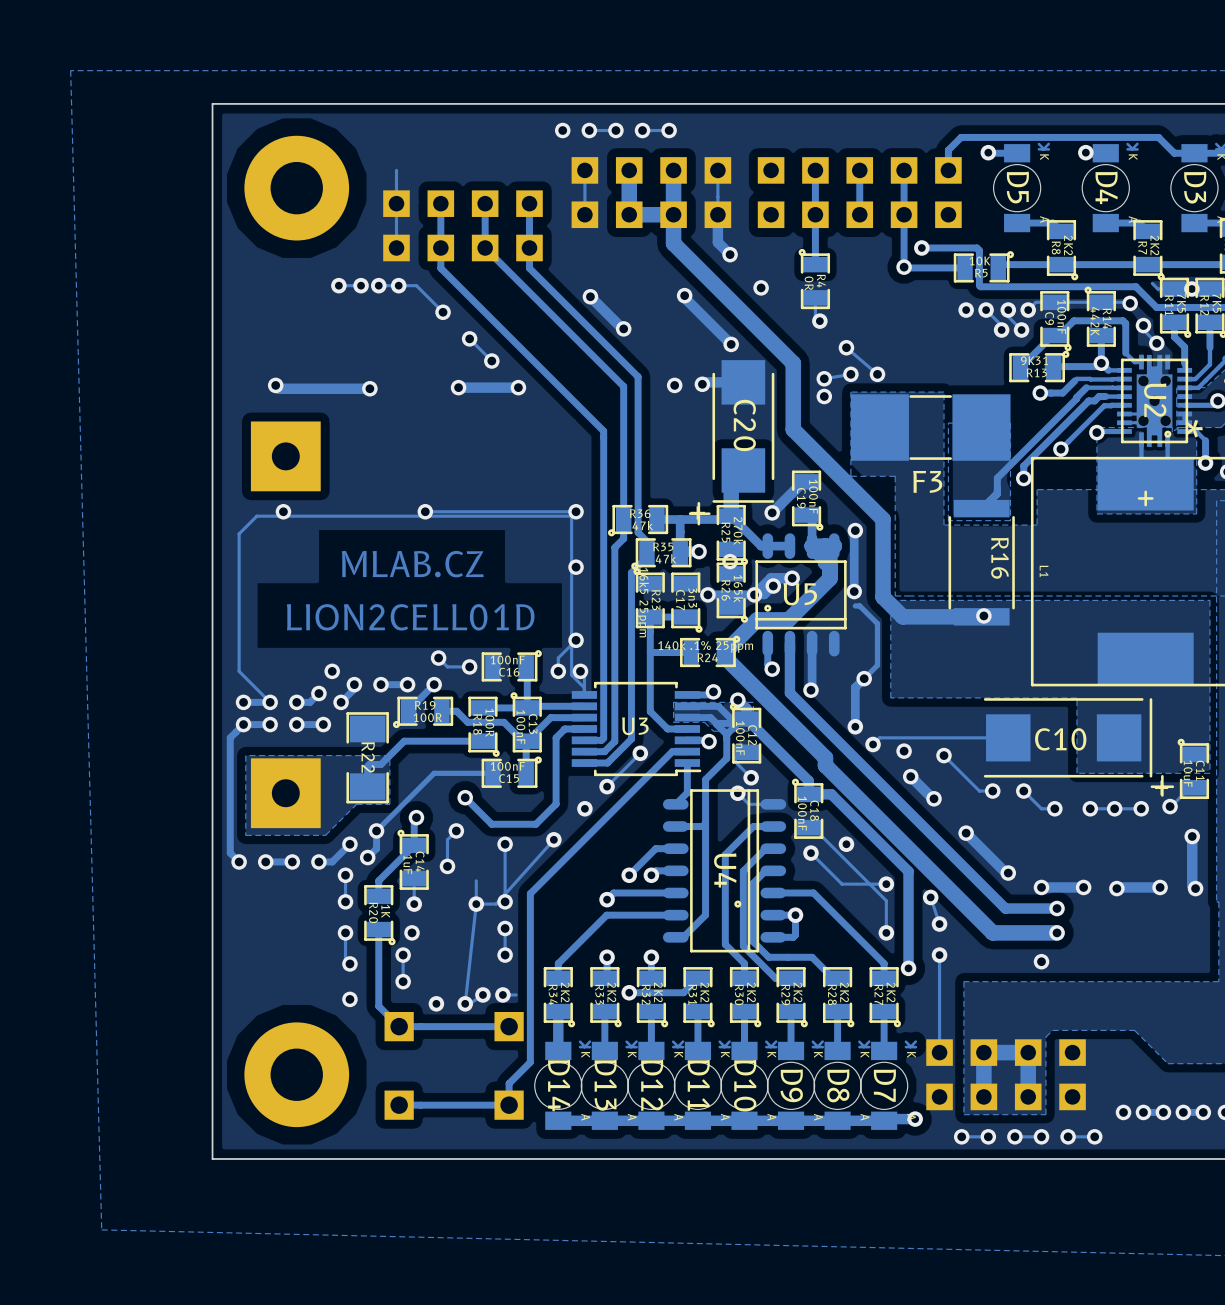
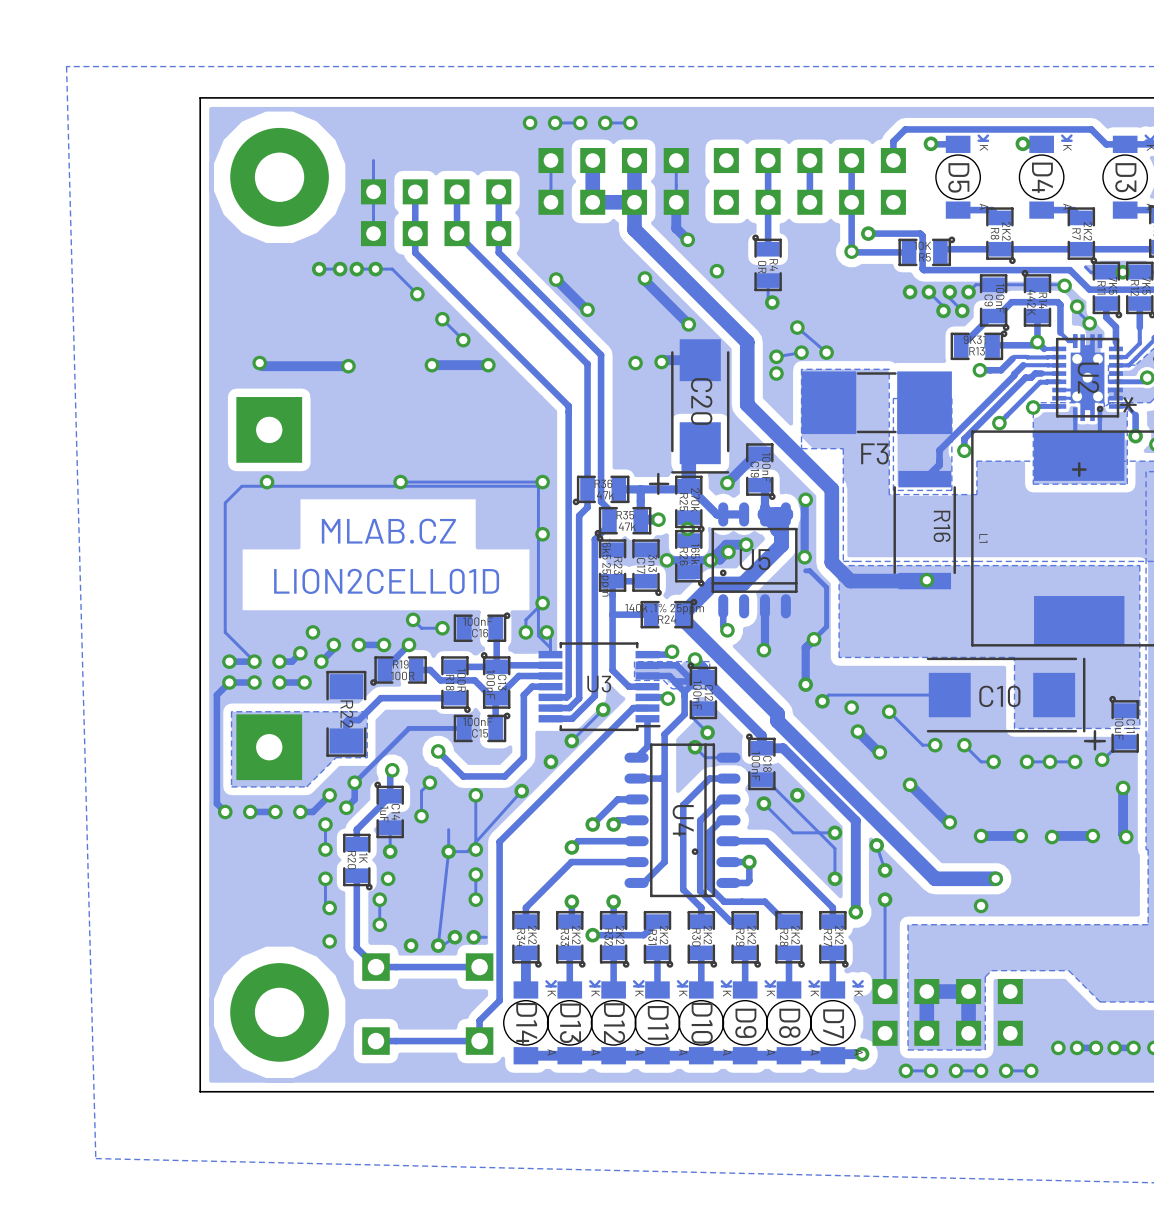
track: (789, 643) (789, 693) (1005, 908) (1057, 908) -> none
via: (1057, 908) -> none

